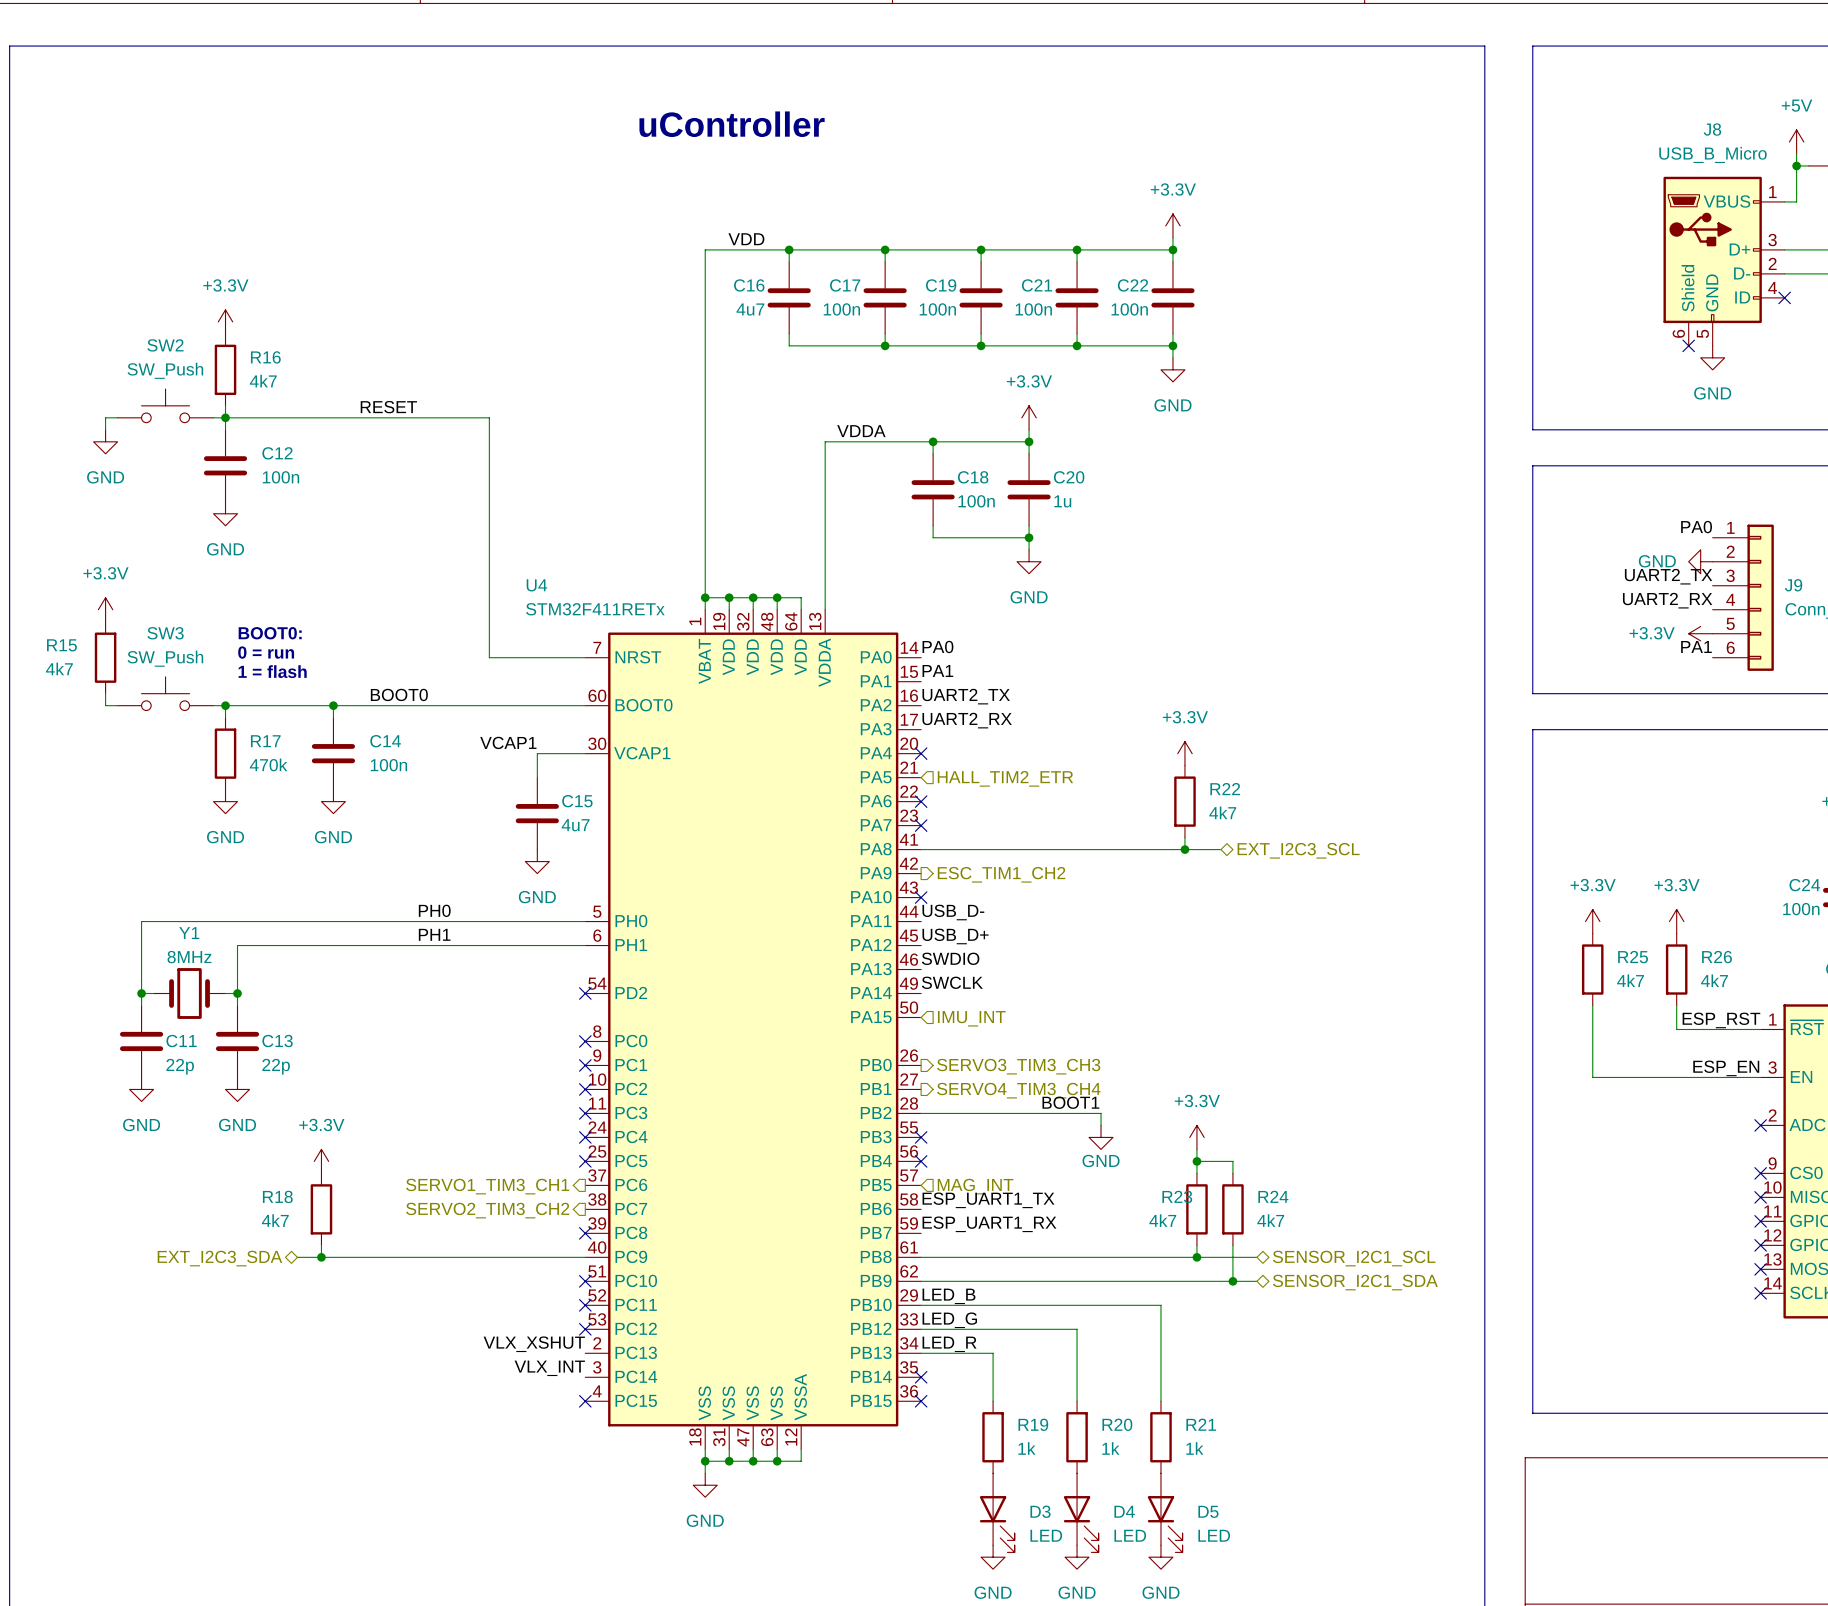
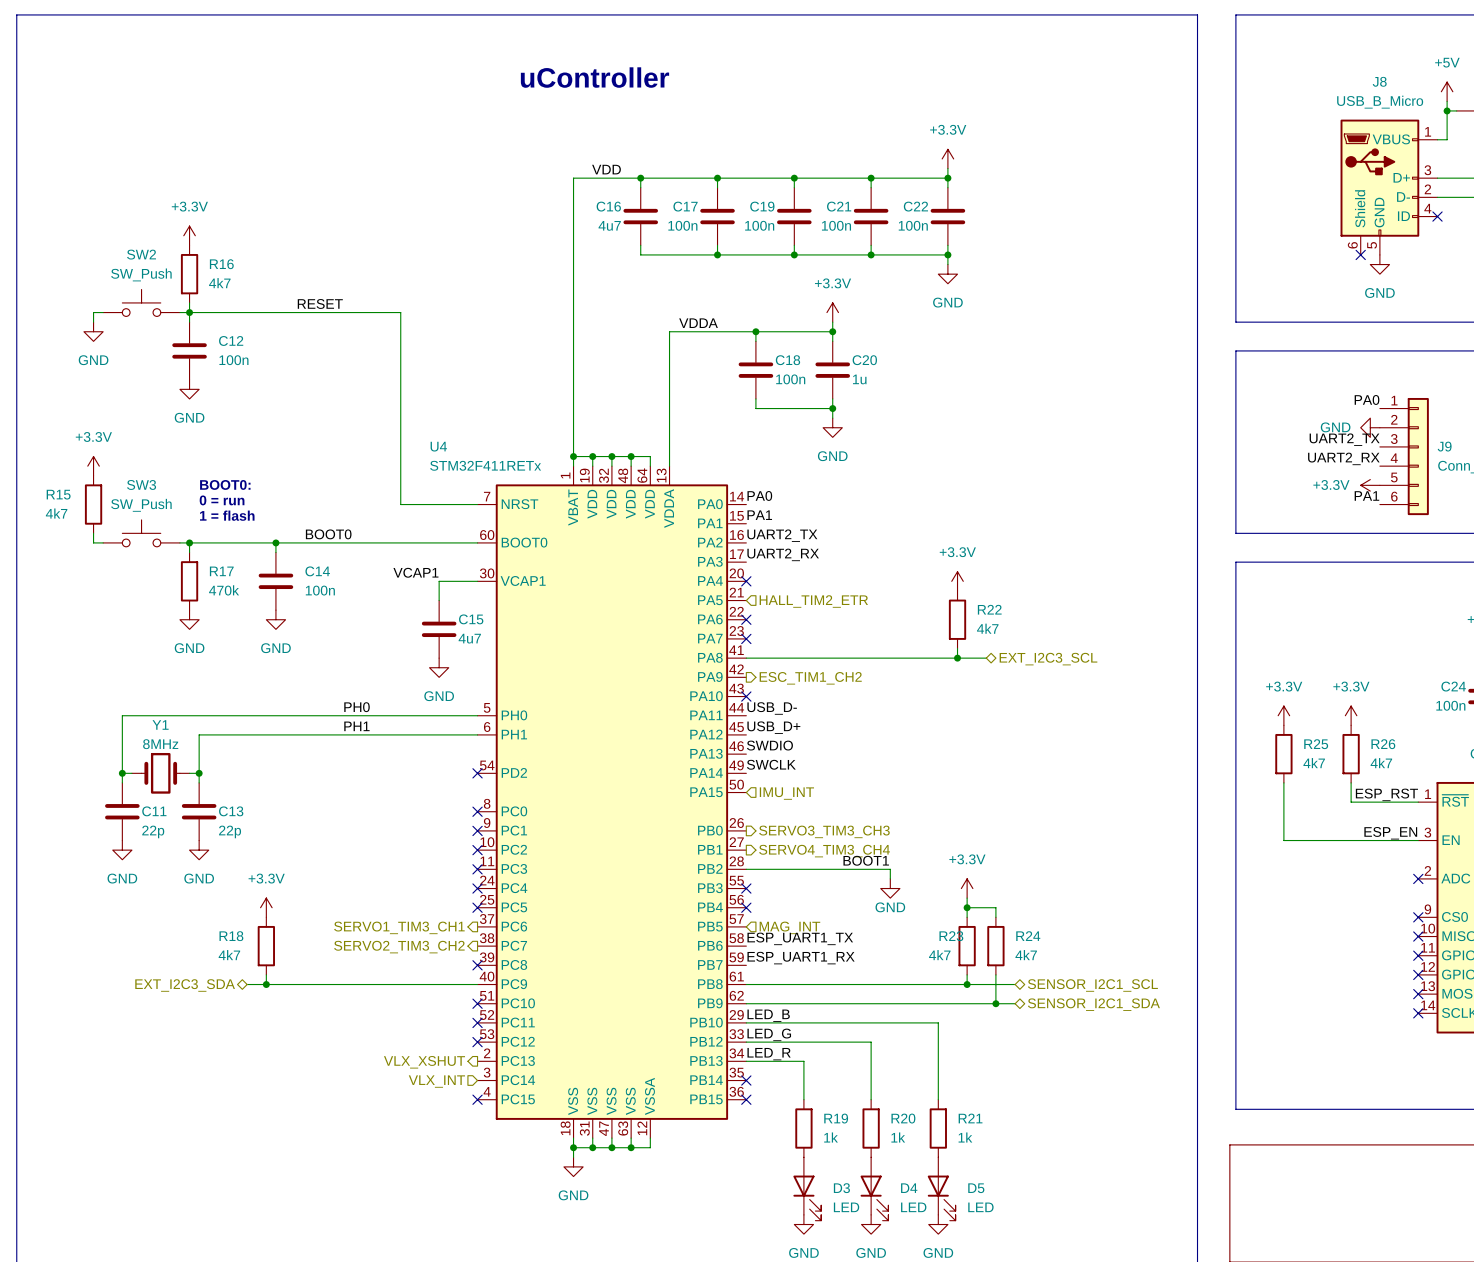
label: VLX_XSHUT (534, 1344) -> none
hierarchical label: none -> VLX_XSHUT (424, 1062)
label: VLX_INT (549, 1368) -> none
hierarchical label: none -> VLX_INT (436, 1081)

